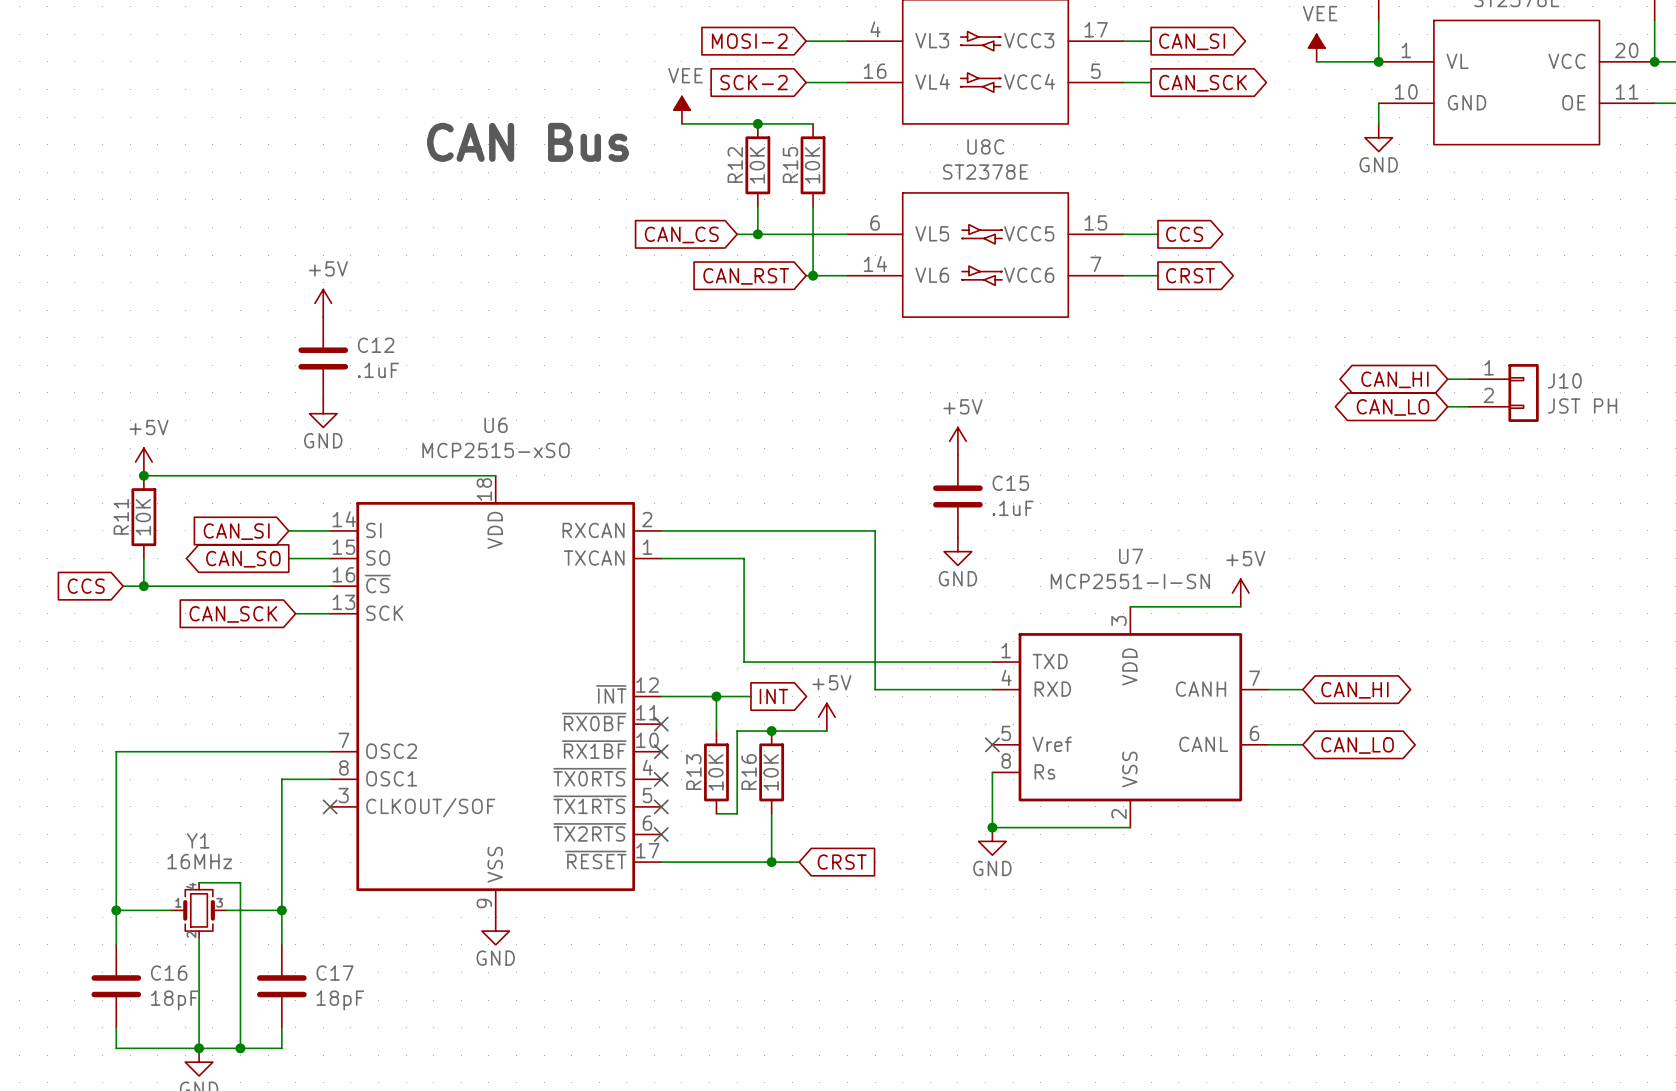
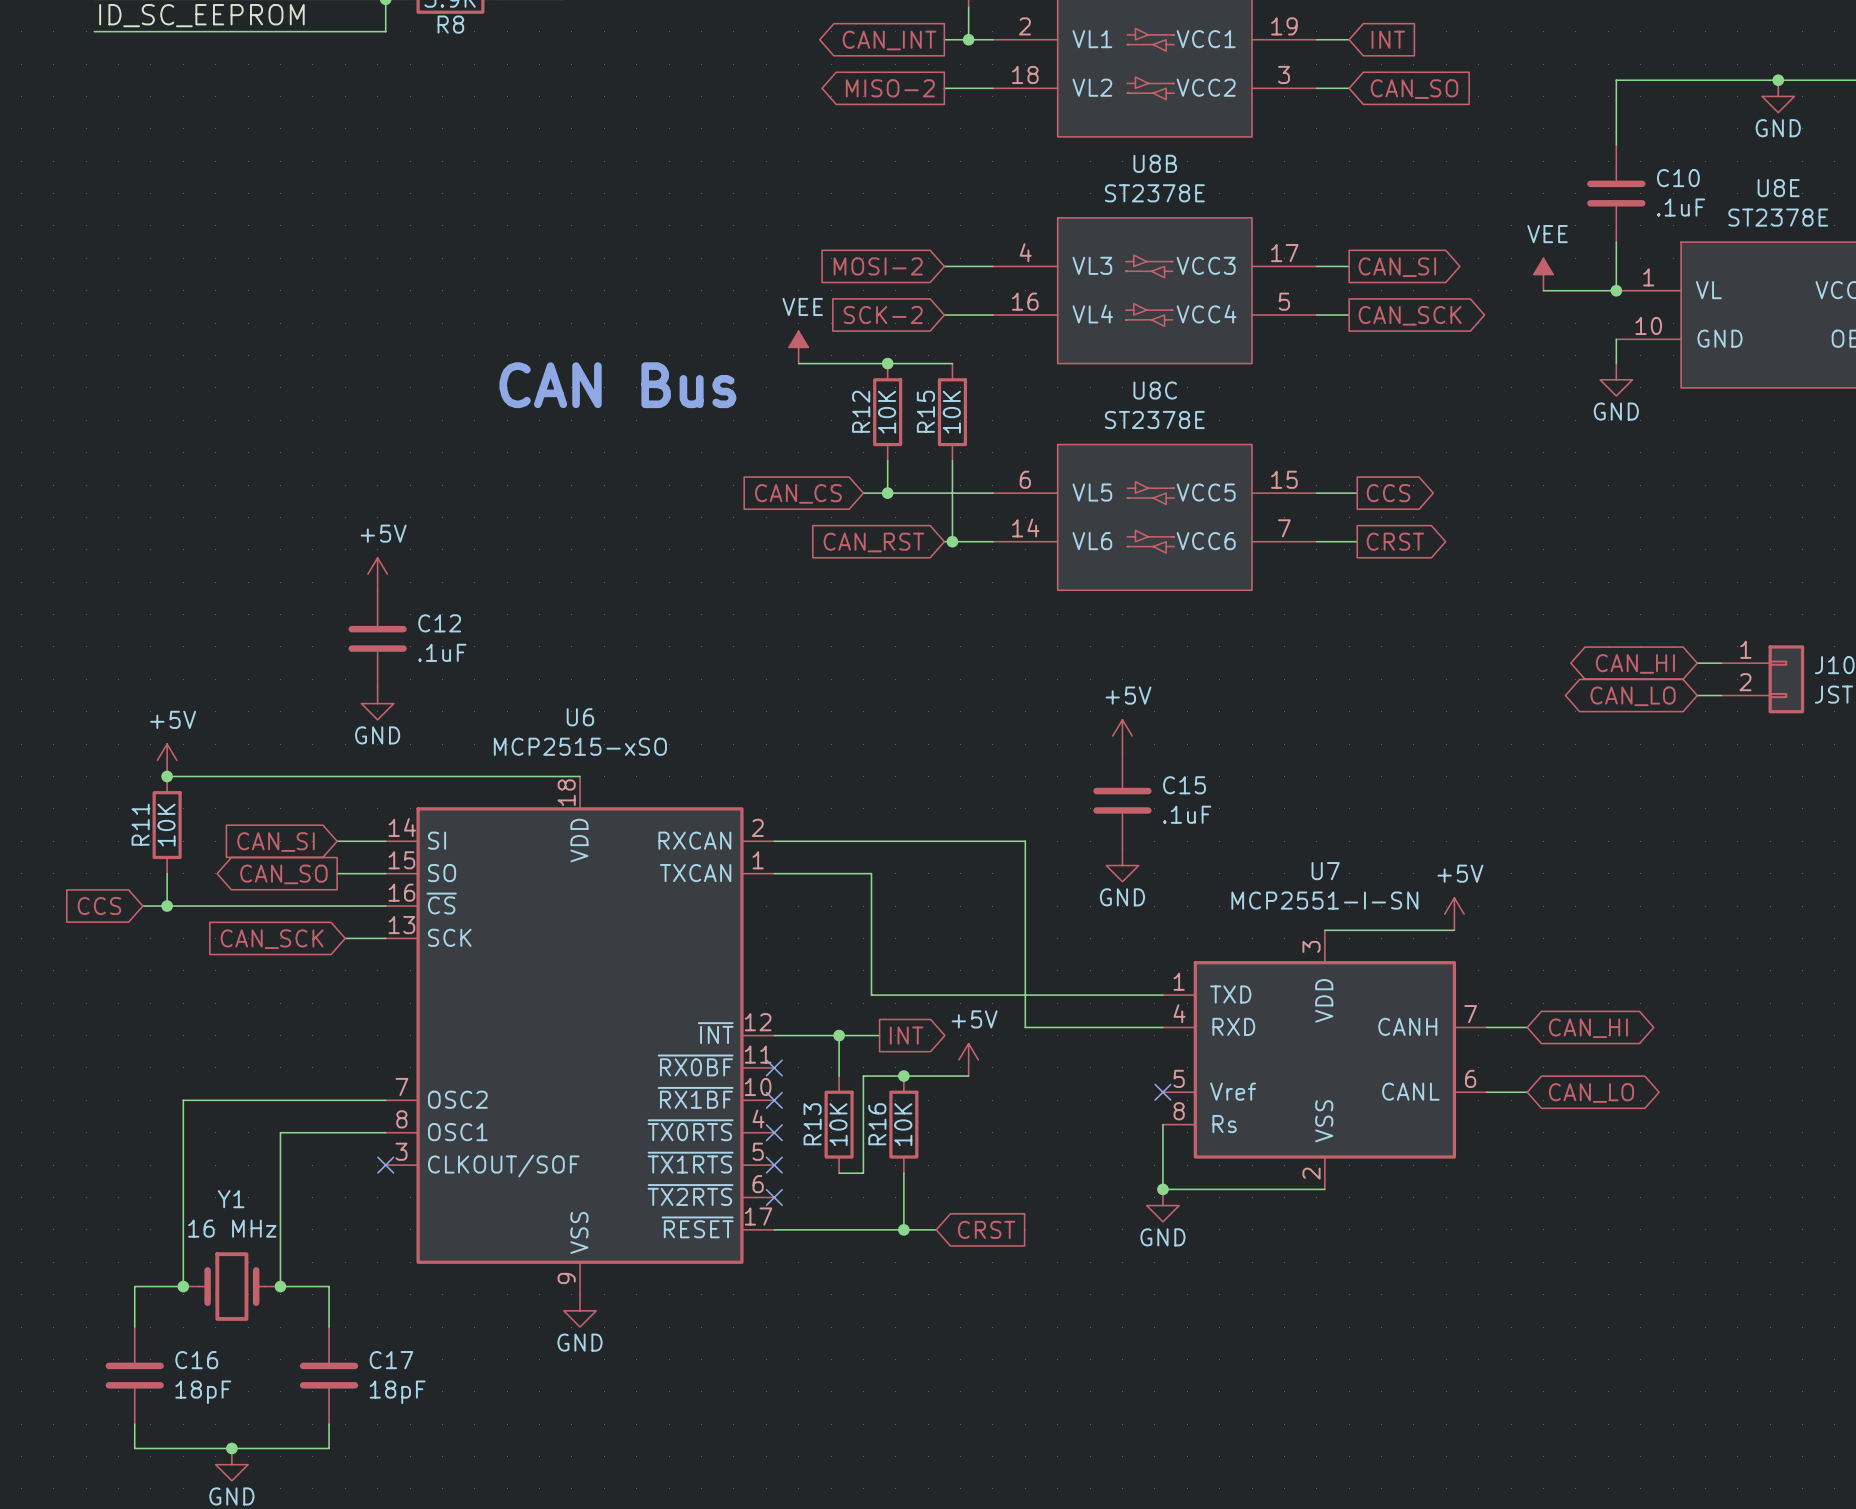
wire: (157, 751) (116, 751) (116, 910) -> (183, 1100) (183, 1286)
wire: (281, 779) (281, 910) -> (329, 1132) (280, 1132) (280, 1254)
Y1 value: 16MHz (199, 861) -> 16 MHz (232, 1228)
Y1 symbol: [171, 882, 227, 938] -> [183, 1252, 281, 1321]
wire: (199, 882) (240, 882) -> none
junction position: (116, 910) -> (183, 1286)
wire: (226, 910) (240, 910) (240, 1048) -> none
junction position: (281, 910) -> (280, 1286)
wire: (199, 937) (199, 1048) -> none
junction: (240, 1048) -> none

